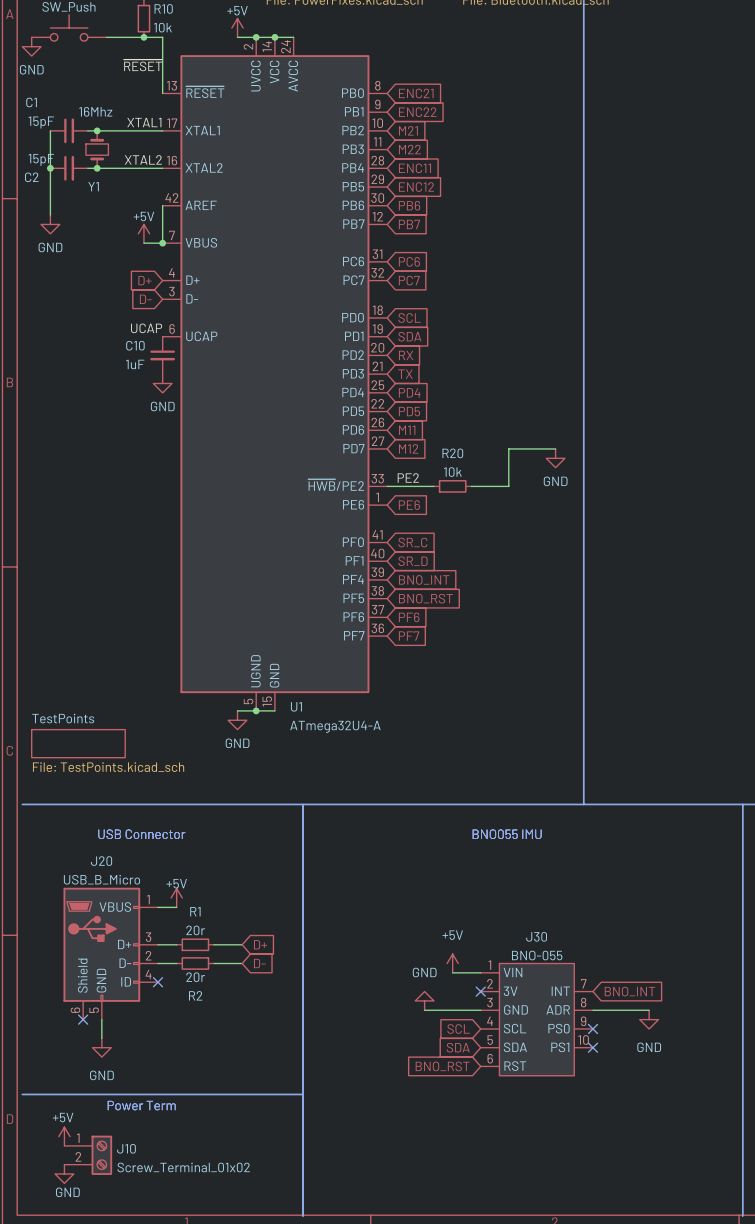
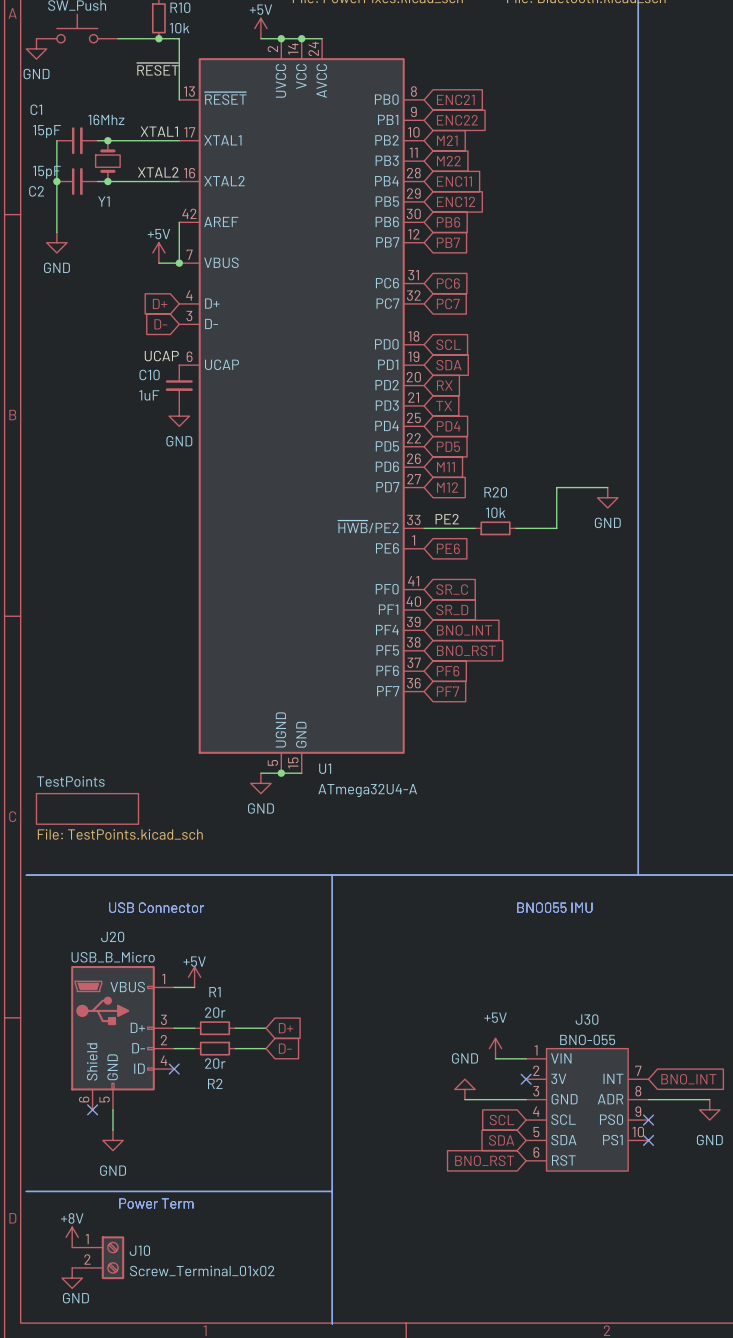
power symbol: +5V (64, 1136) -> +8V (72, 1237)

